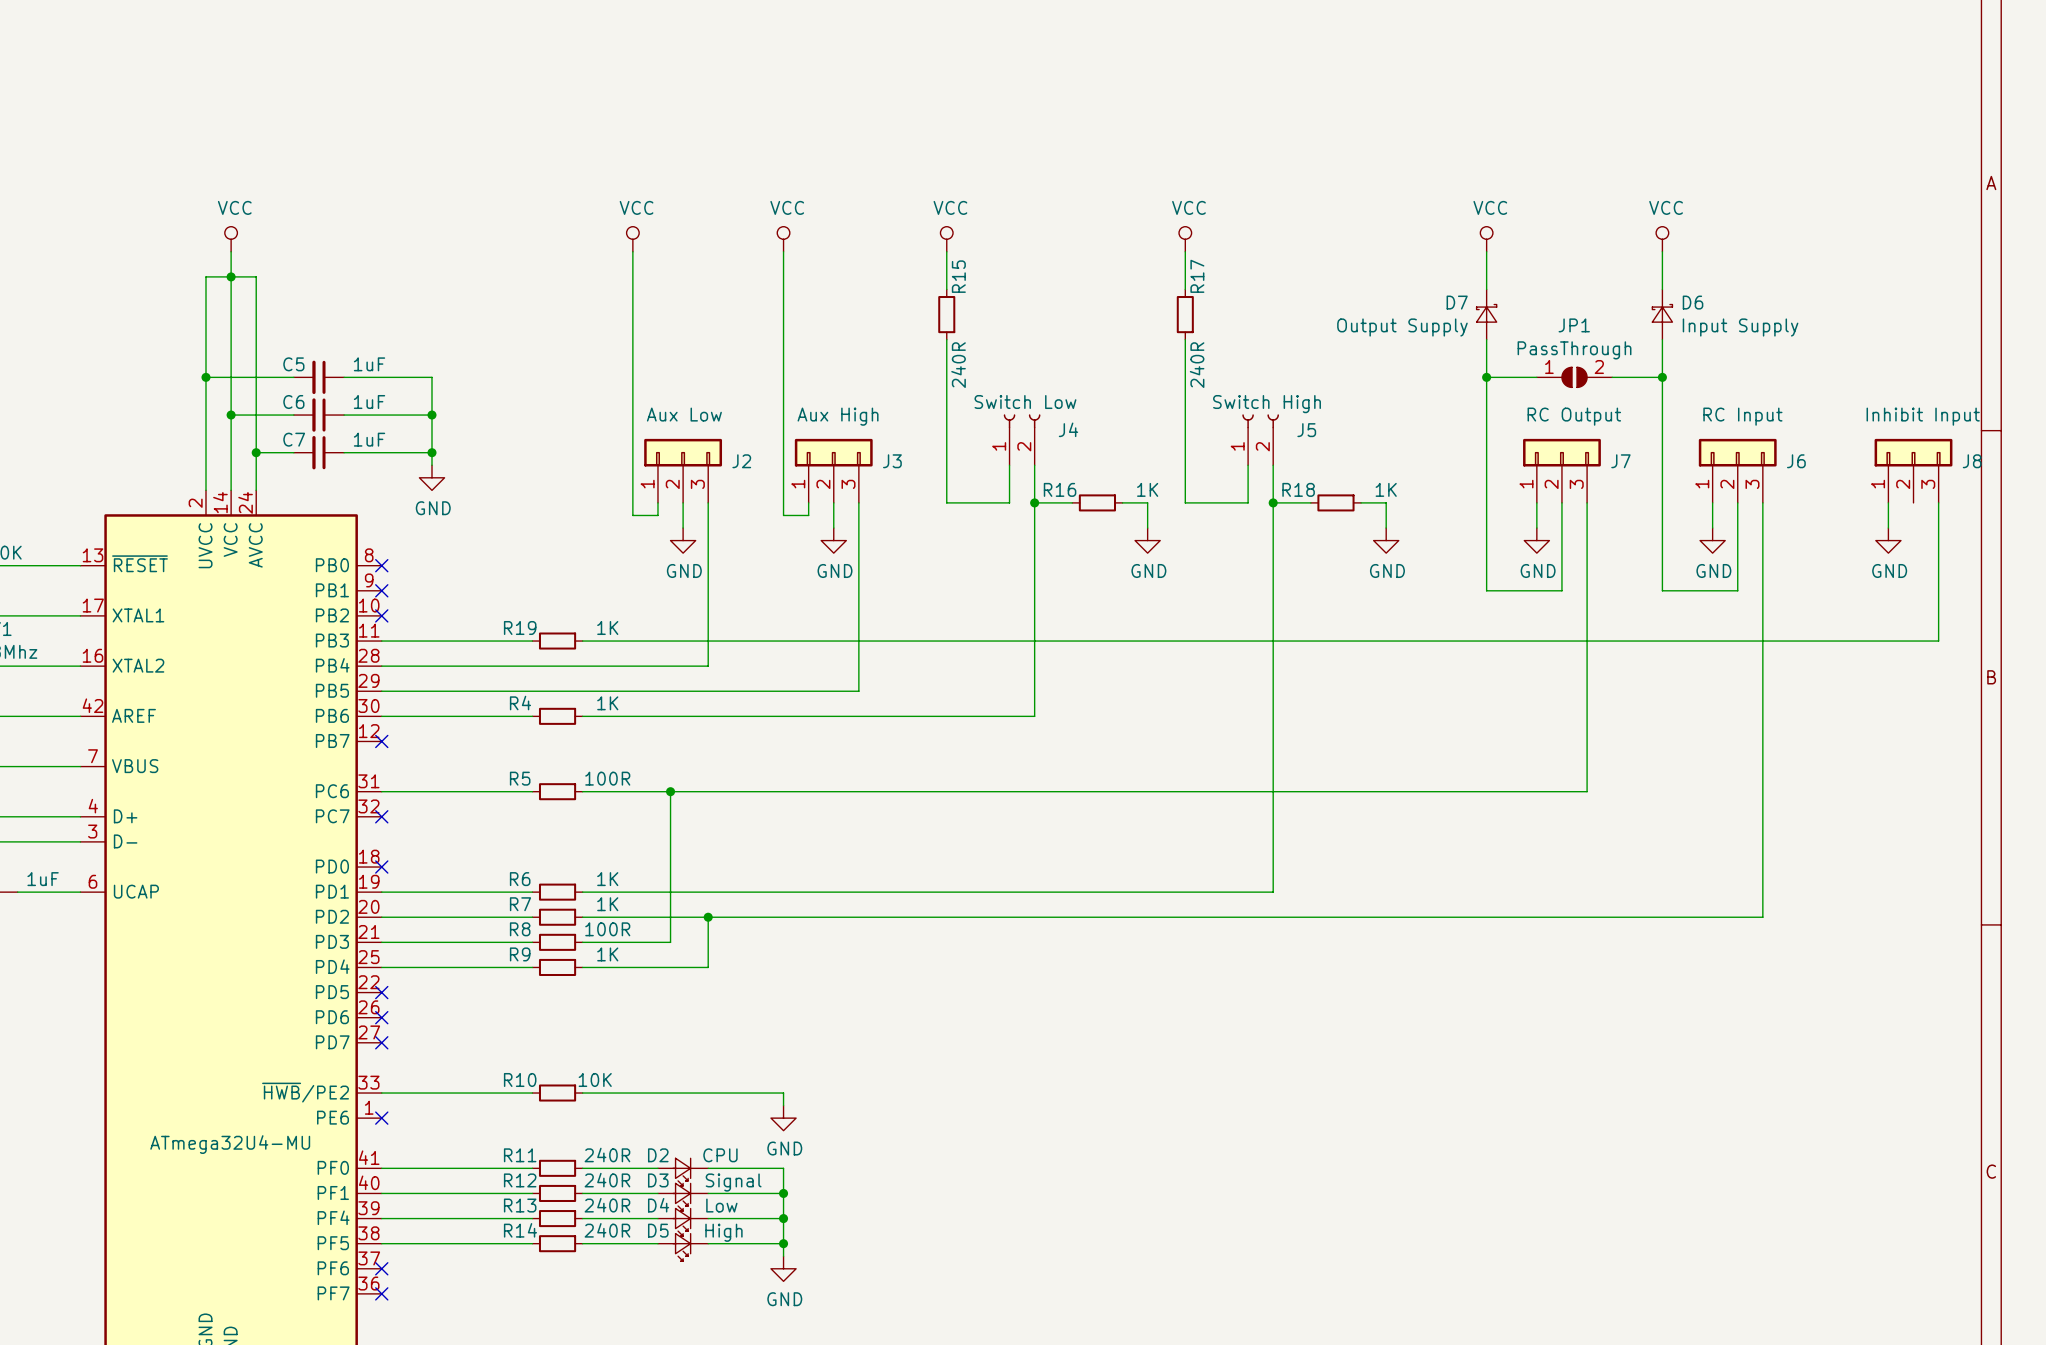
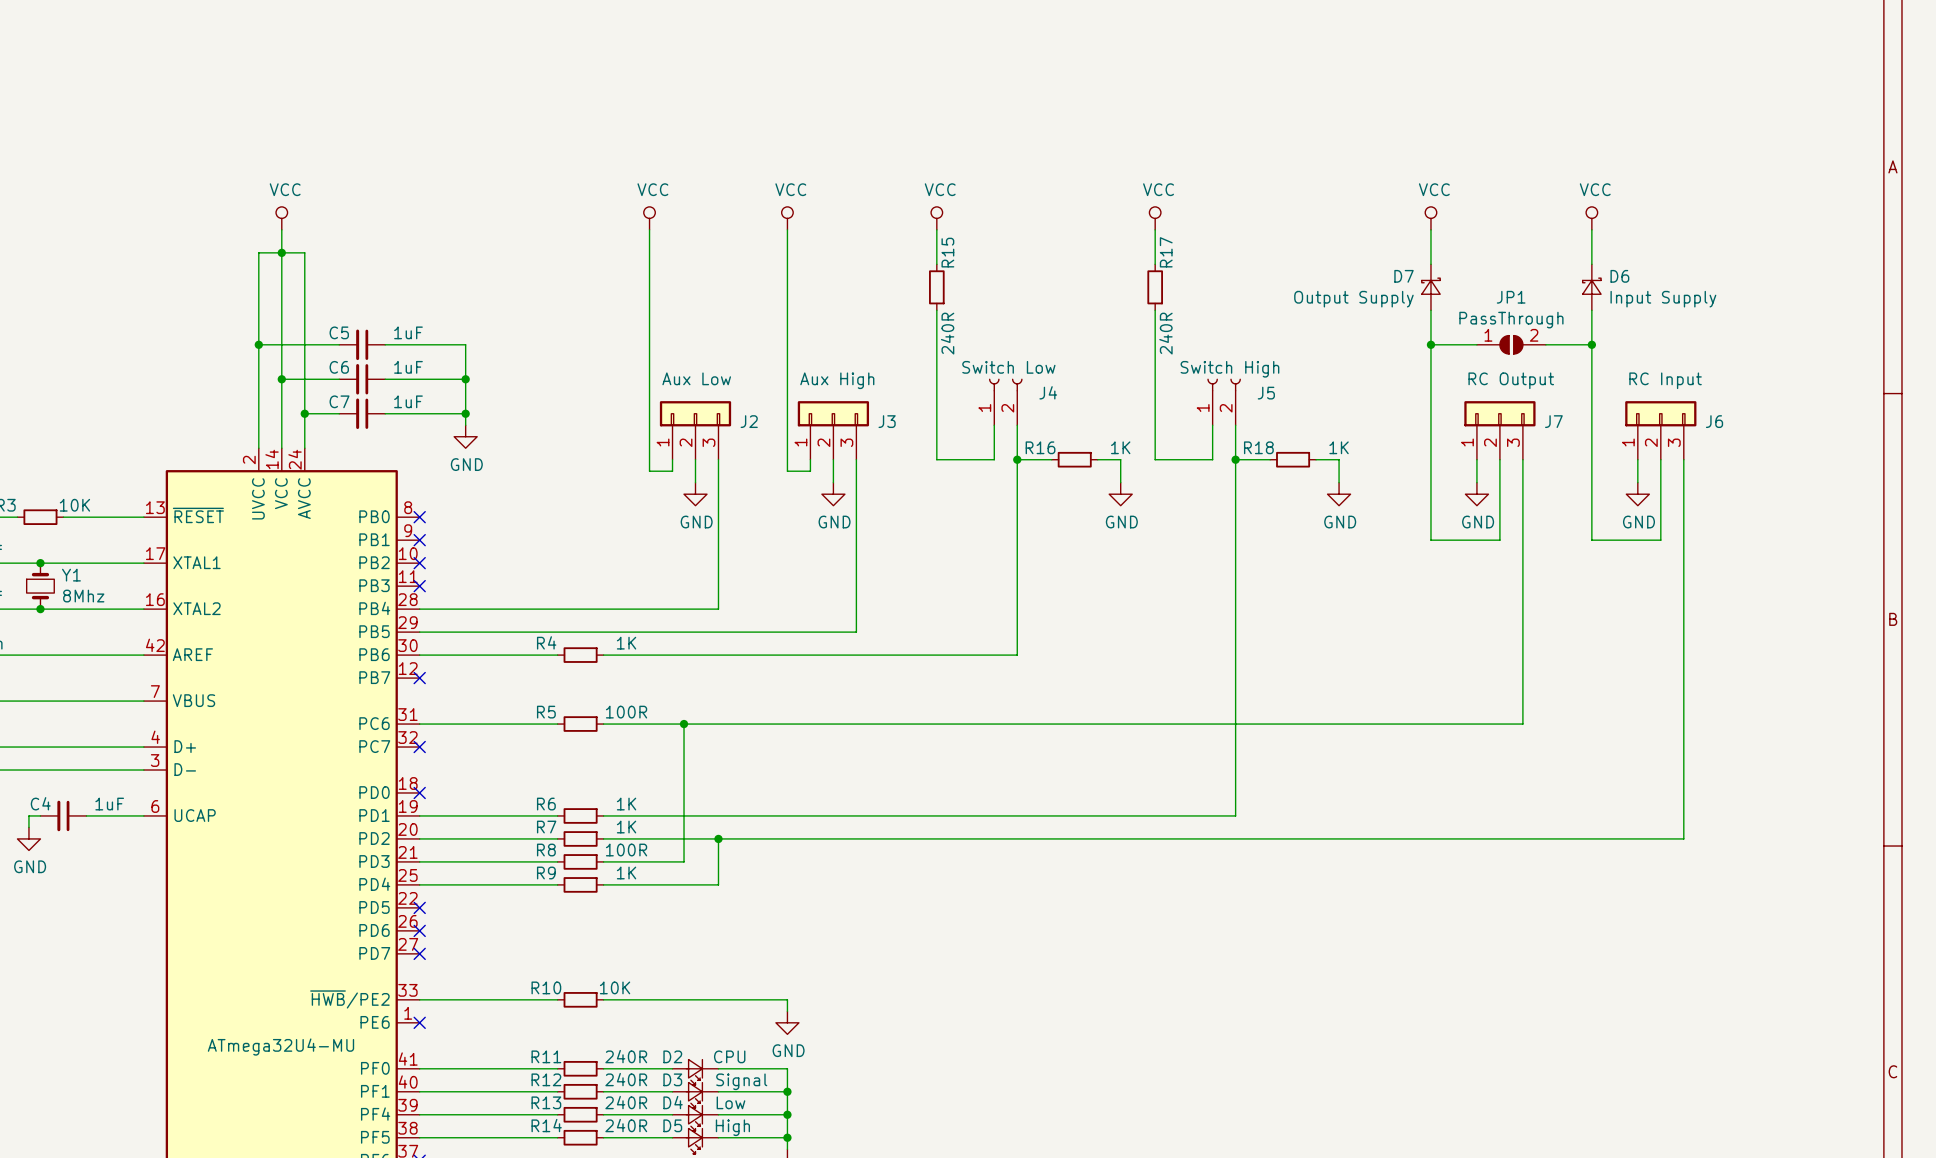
J8: Inhibit Input (1913, 470) -> none
wire: (1888, 502) (1888, 528) -> none
wire: (1938, 502) (1938, 641) (582, 641) -> none
power symbol: GND (1888, 540) -> none
wire: (381, 641) (532, 641) -> none
no-connect mark: none -> (419, 586)
R19: 1K (557, 641) -> none

